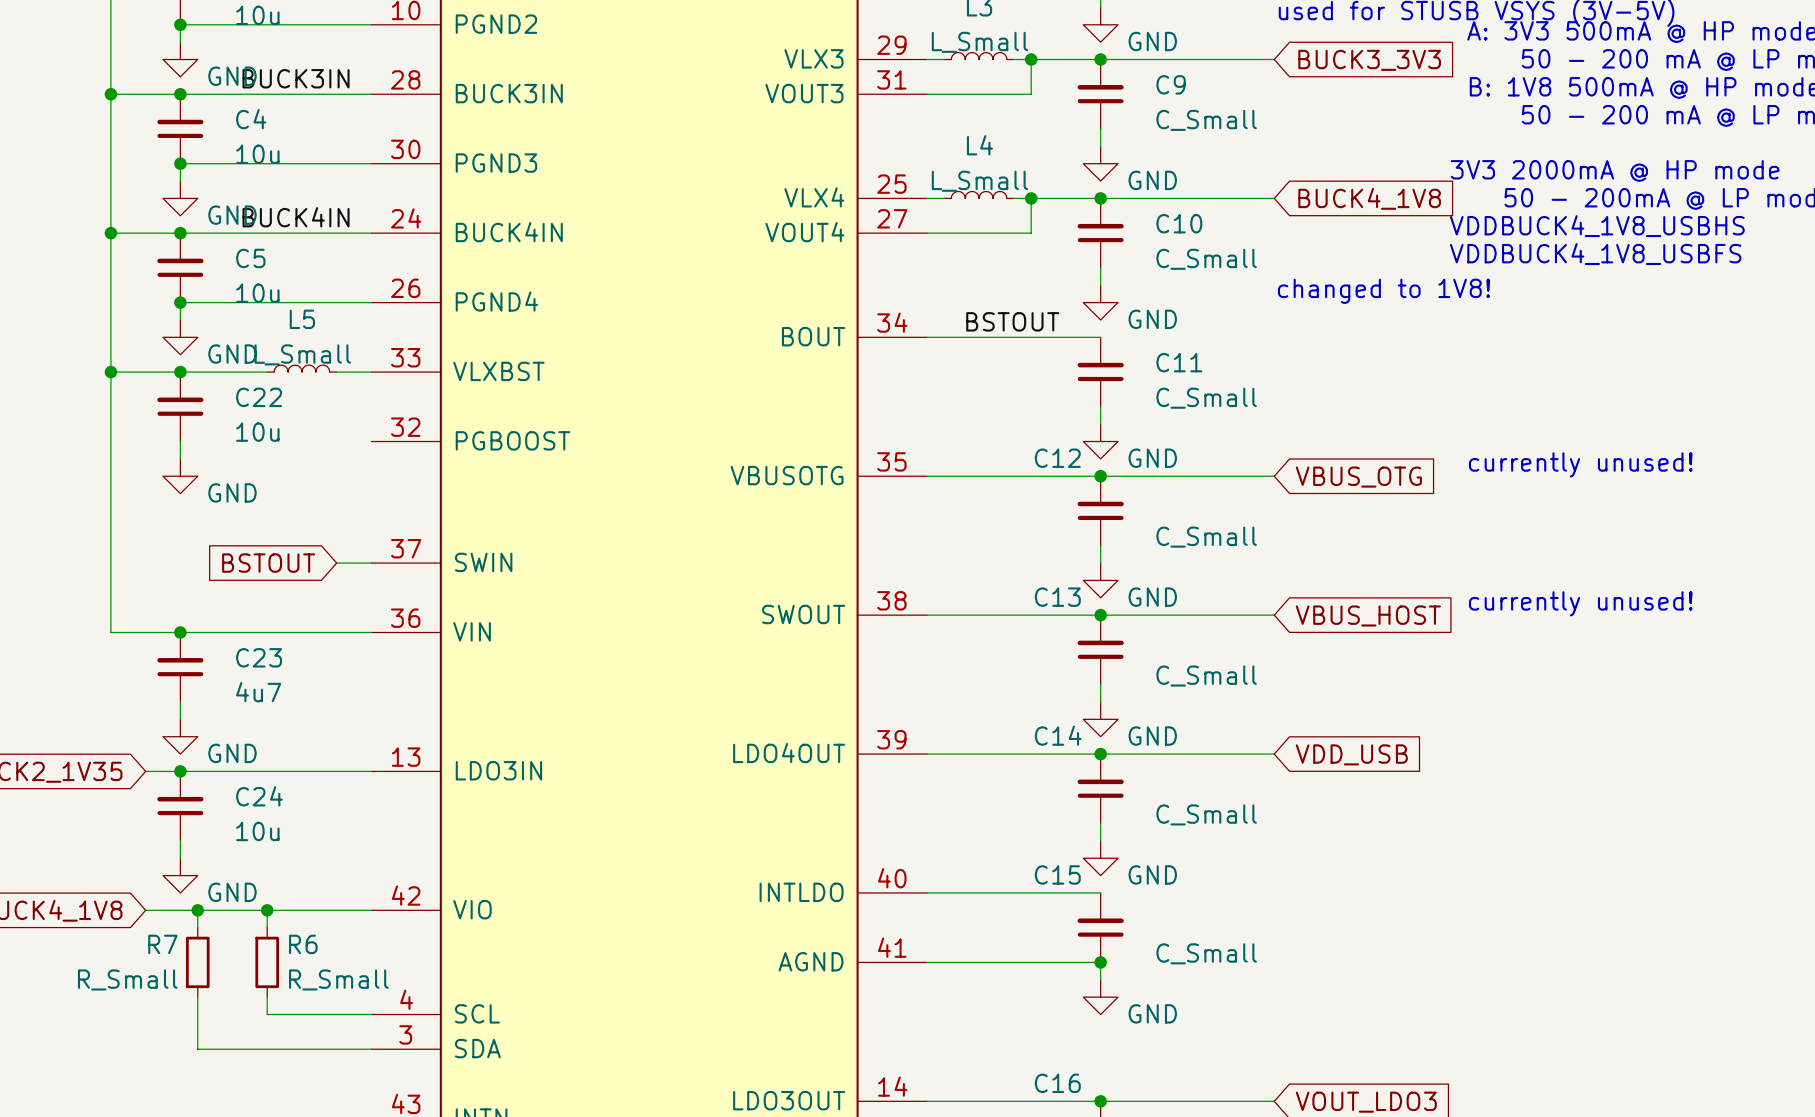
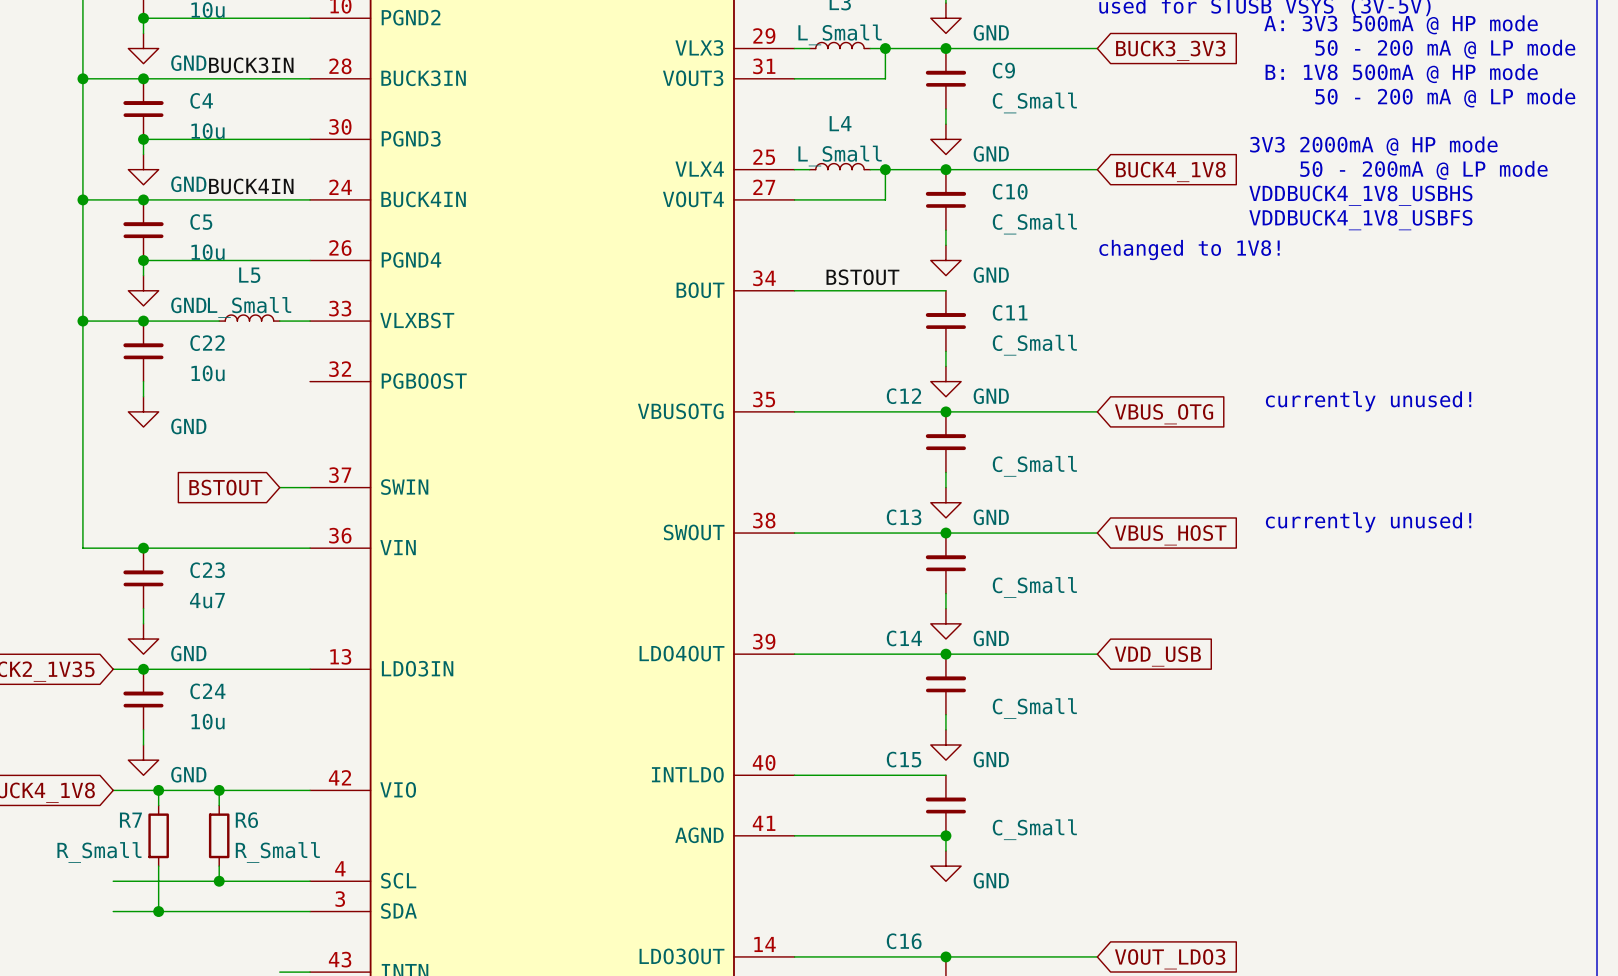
wire: none -> (113, 881) (219, 881)
junction: none -> (219, 881)
wire: none -> (113, 911) (158, 911)
junction: none -> (158, 911)

